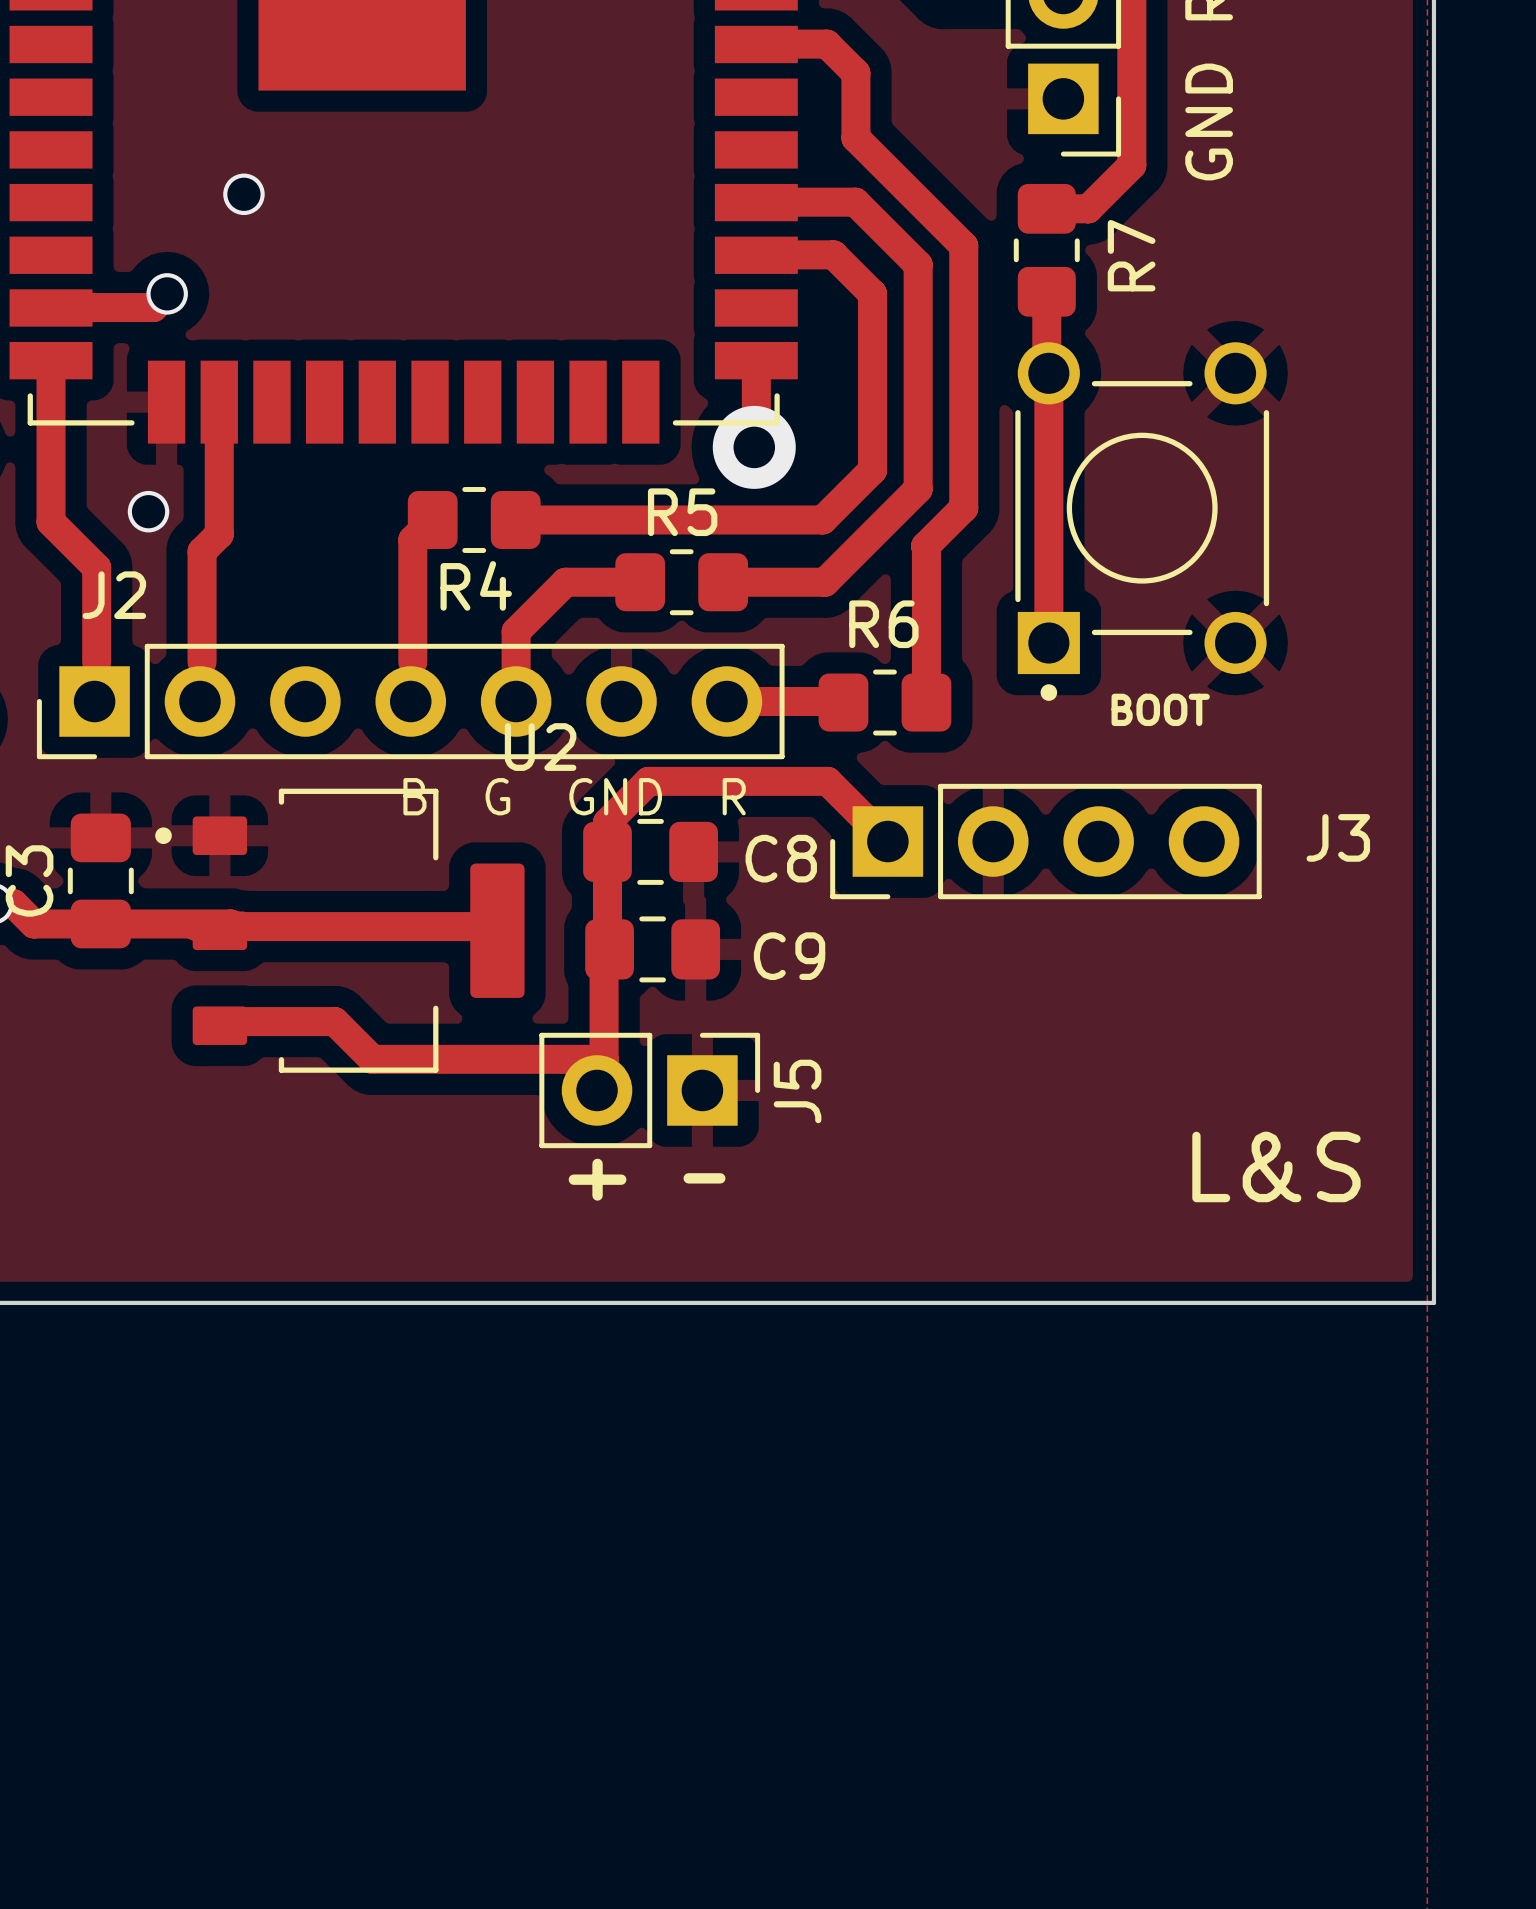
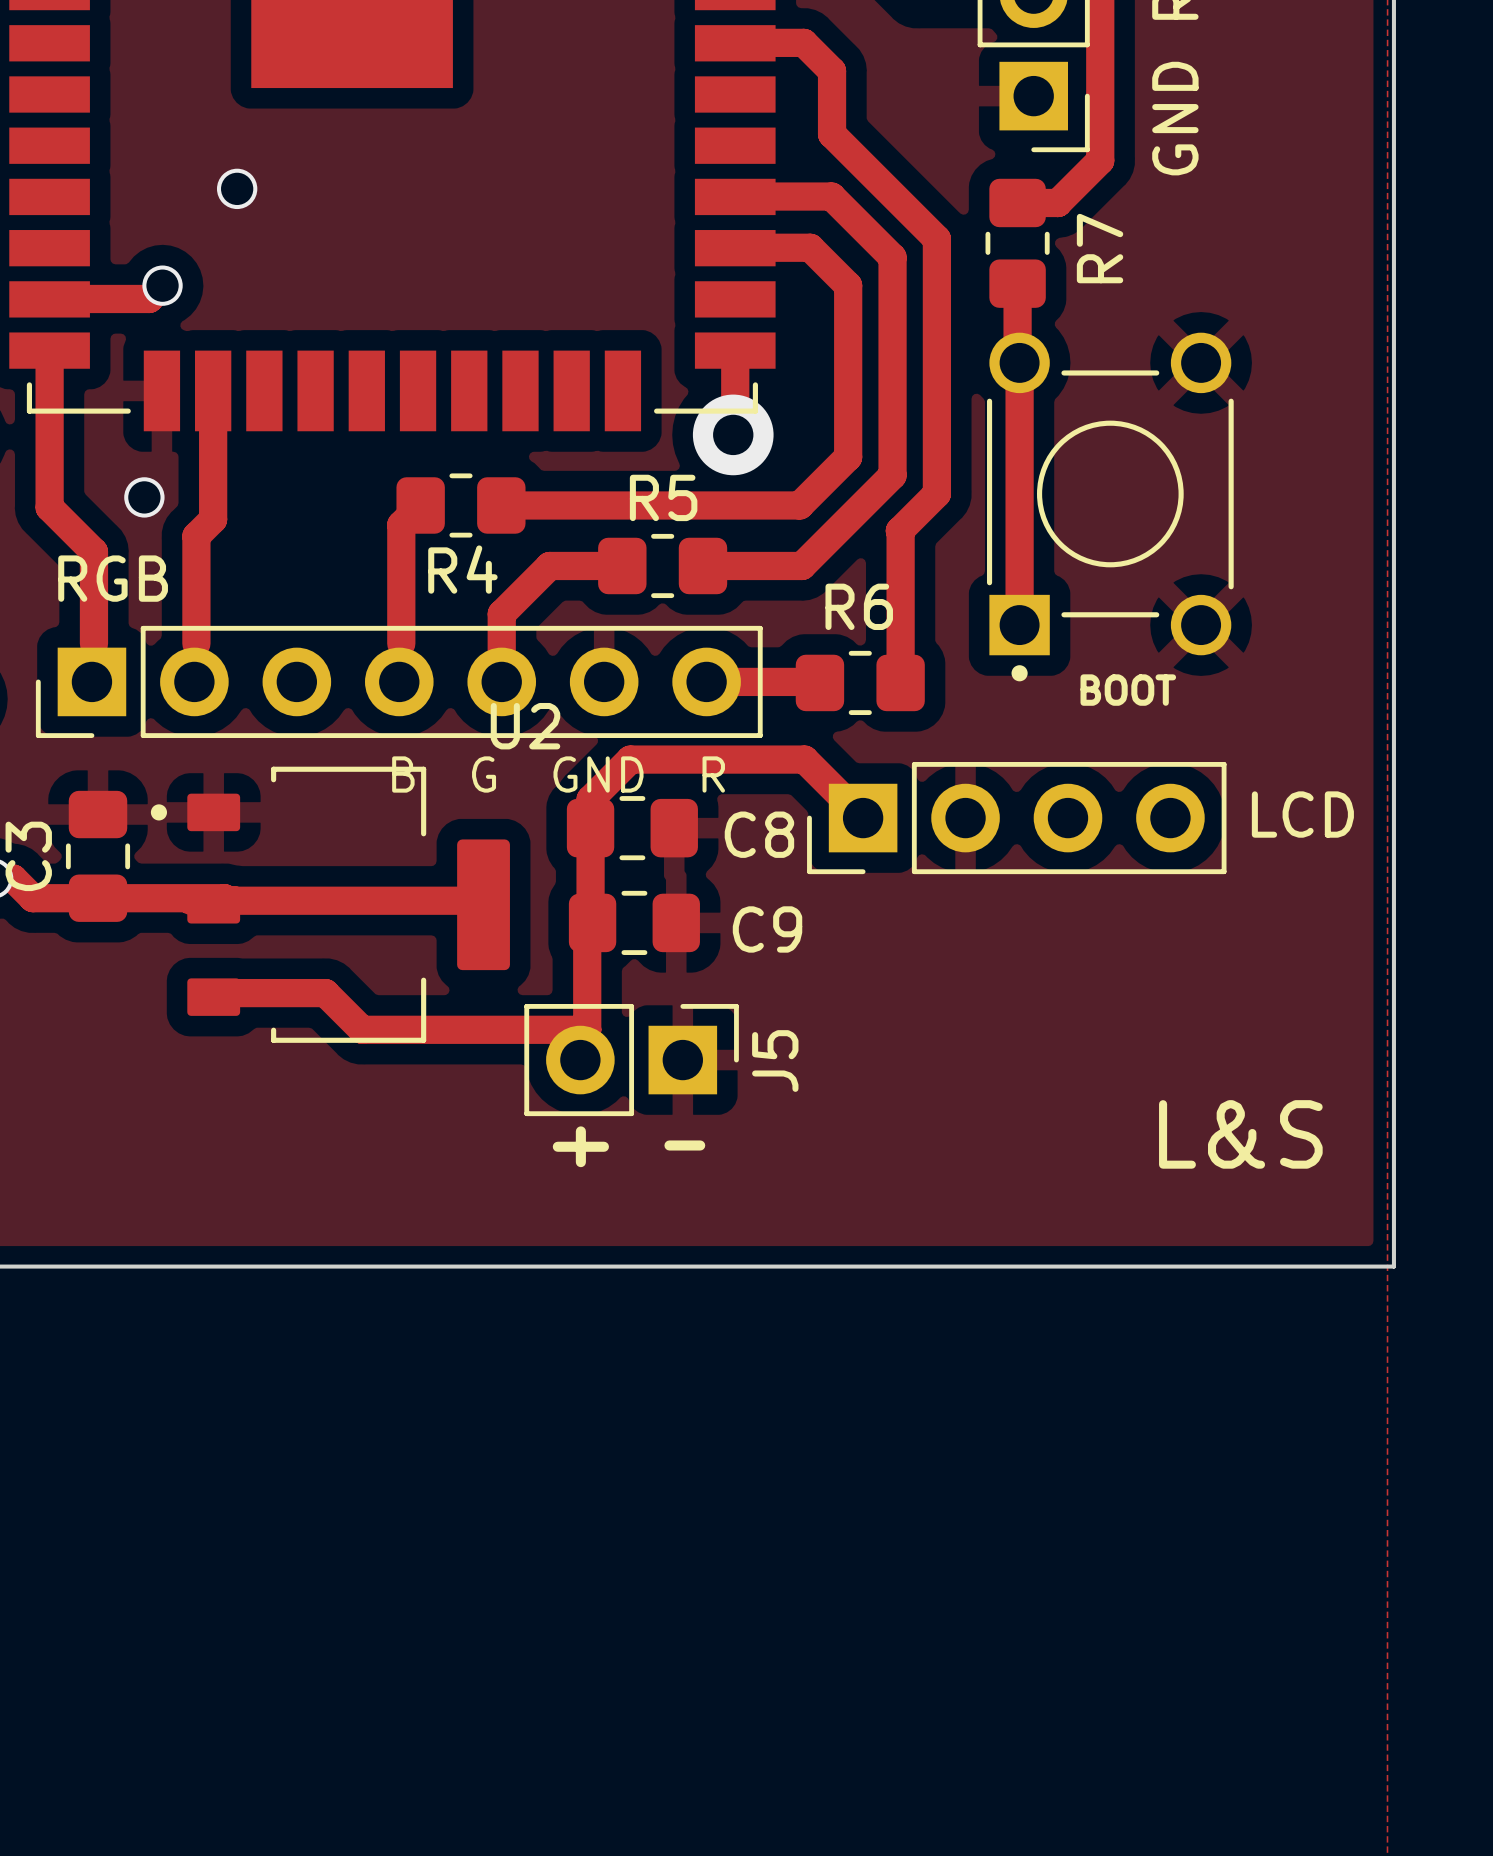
J2 name: J2 (114, 595) -> RGB (113, 578)
J3 name: J3 (1338, 837) -> LCD (1302, 814)

